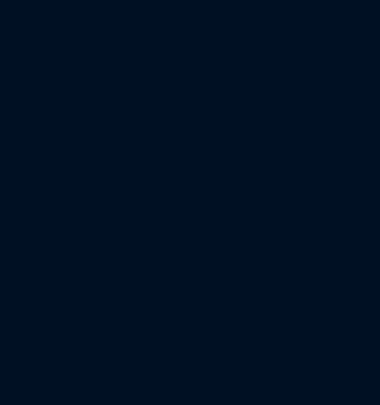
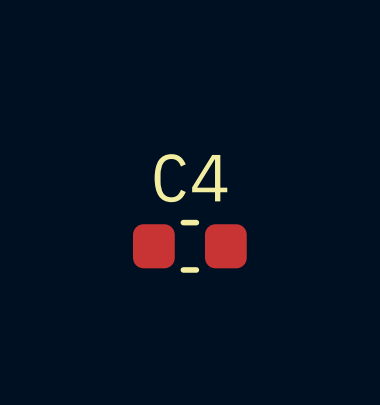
C4: none -> (189, 246)

